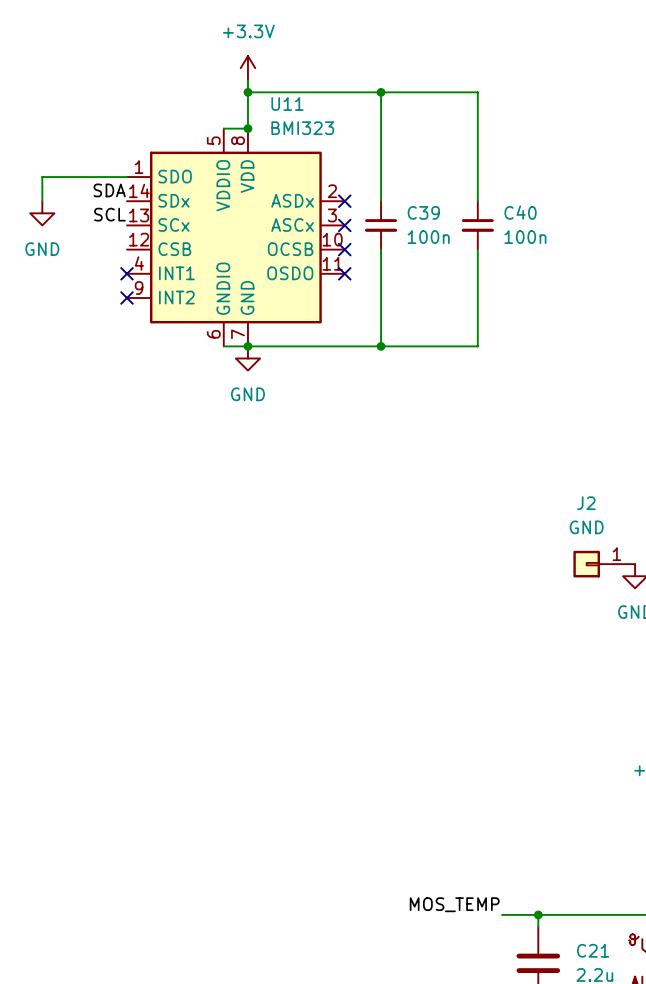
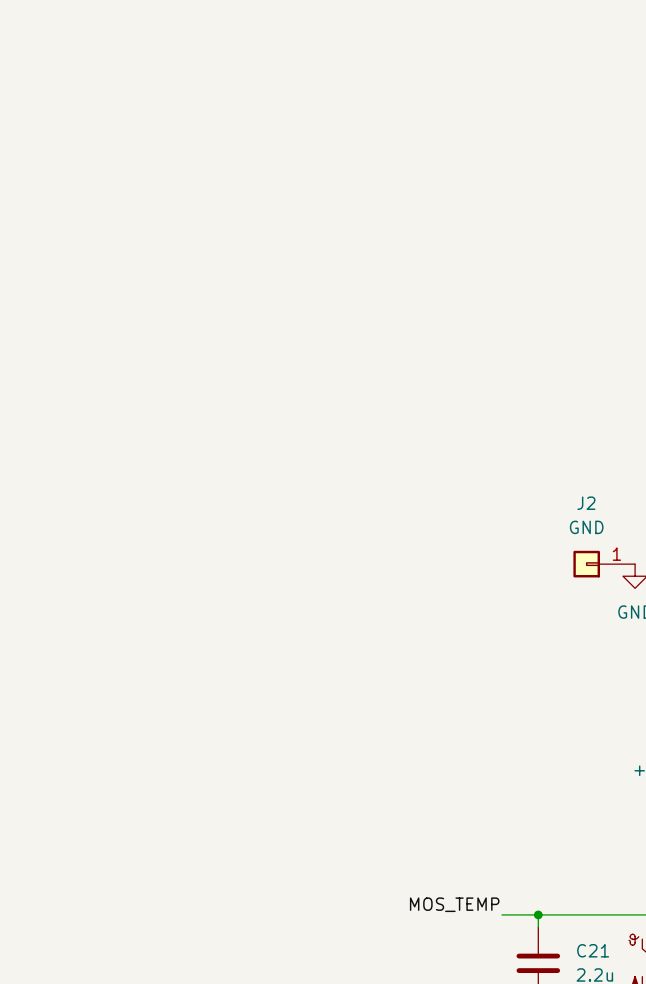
power symbol: +3.3V (247, 68) -> none
wire: (247, 80) (247, 128) (223, 128) -> none
wire: (247, 92) (477, 92) (477, 201) -> none
junction: (247, 92) -> none
wire: (381, 92) (381, 201) -> none
junction: (381, 92) -> none
junction: (247, 128) -> none
wire: (127, 177) (42, 177) (42, 201) -> none
label: SDA (109, 190) -> none
no-connect mark: (344, 201) -> none
power symbol: GND (42, 213) -> none
label: SCL (109, 214) -> none
no-connect mark: (344, 225) -> none
C39: 100n (381, 225) -> none
C40: 100n (477, 225) -> none
U11: BMI323 (235, 237) -> none
no-connect mark: (344, 249) -> none
wire: (381, 249) (381, 346) -> none
wire: (477, 249) (477, 346) (223, 346) -> none
no-connect mark: (127, 273) -> none
no-connect mark: (344, 273) -> none
no-connect mark: (127, 298) -> none
junction: (247, 346) -> none
junction: (381, 346) -> none
power symbol: GND (247, 358) -> none

